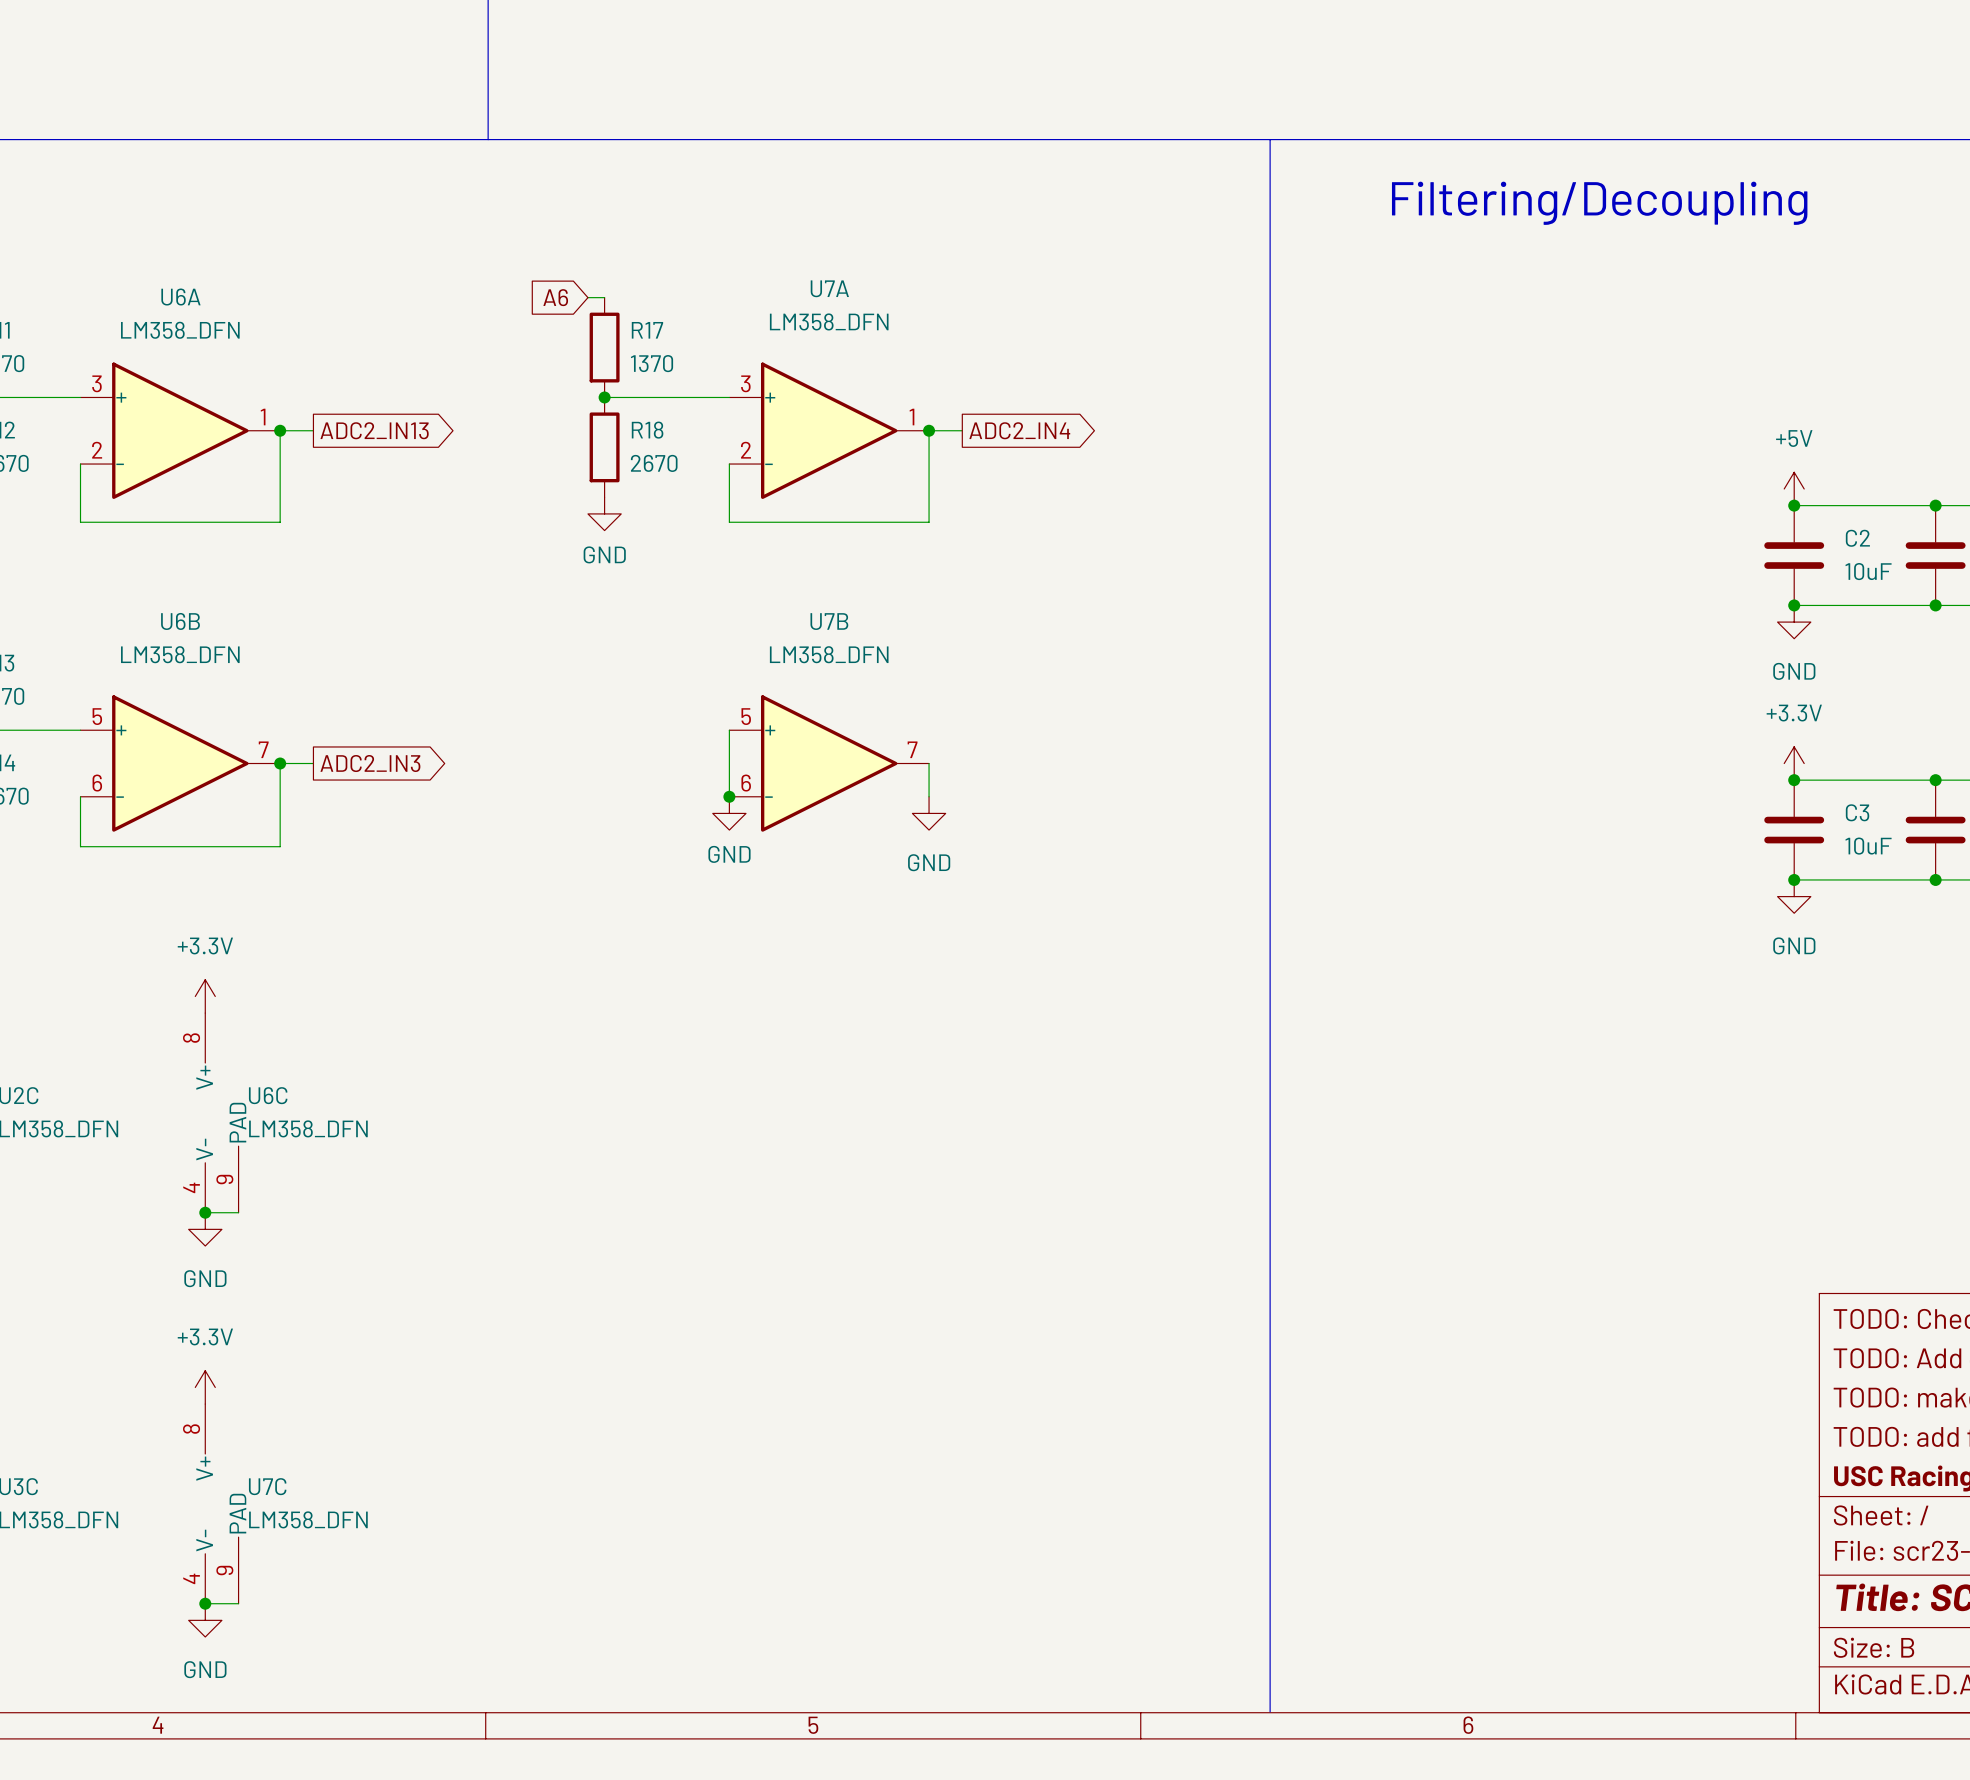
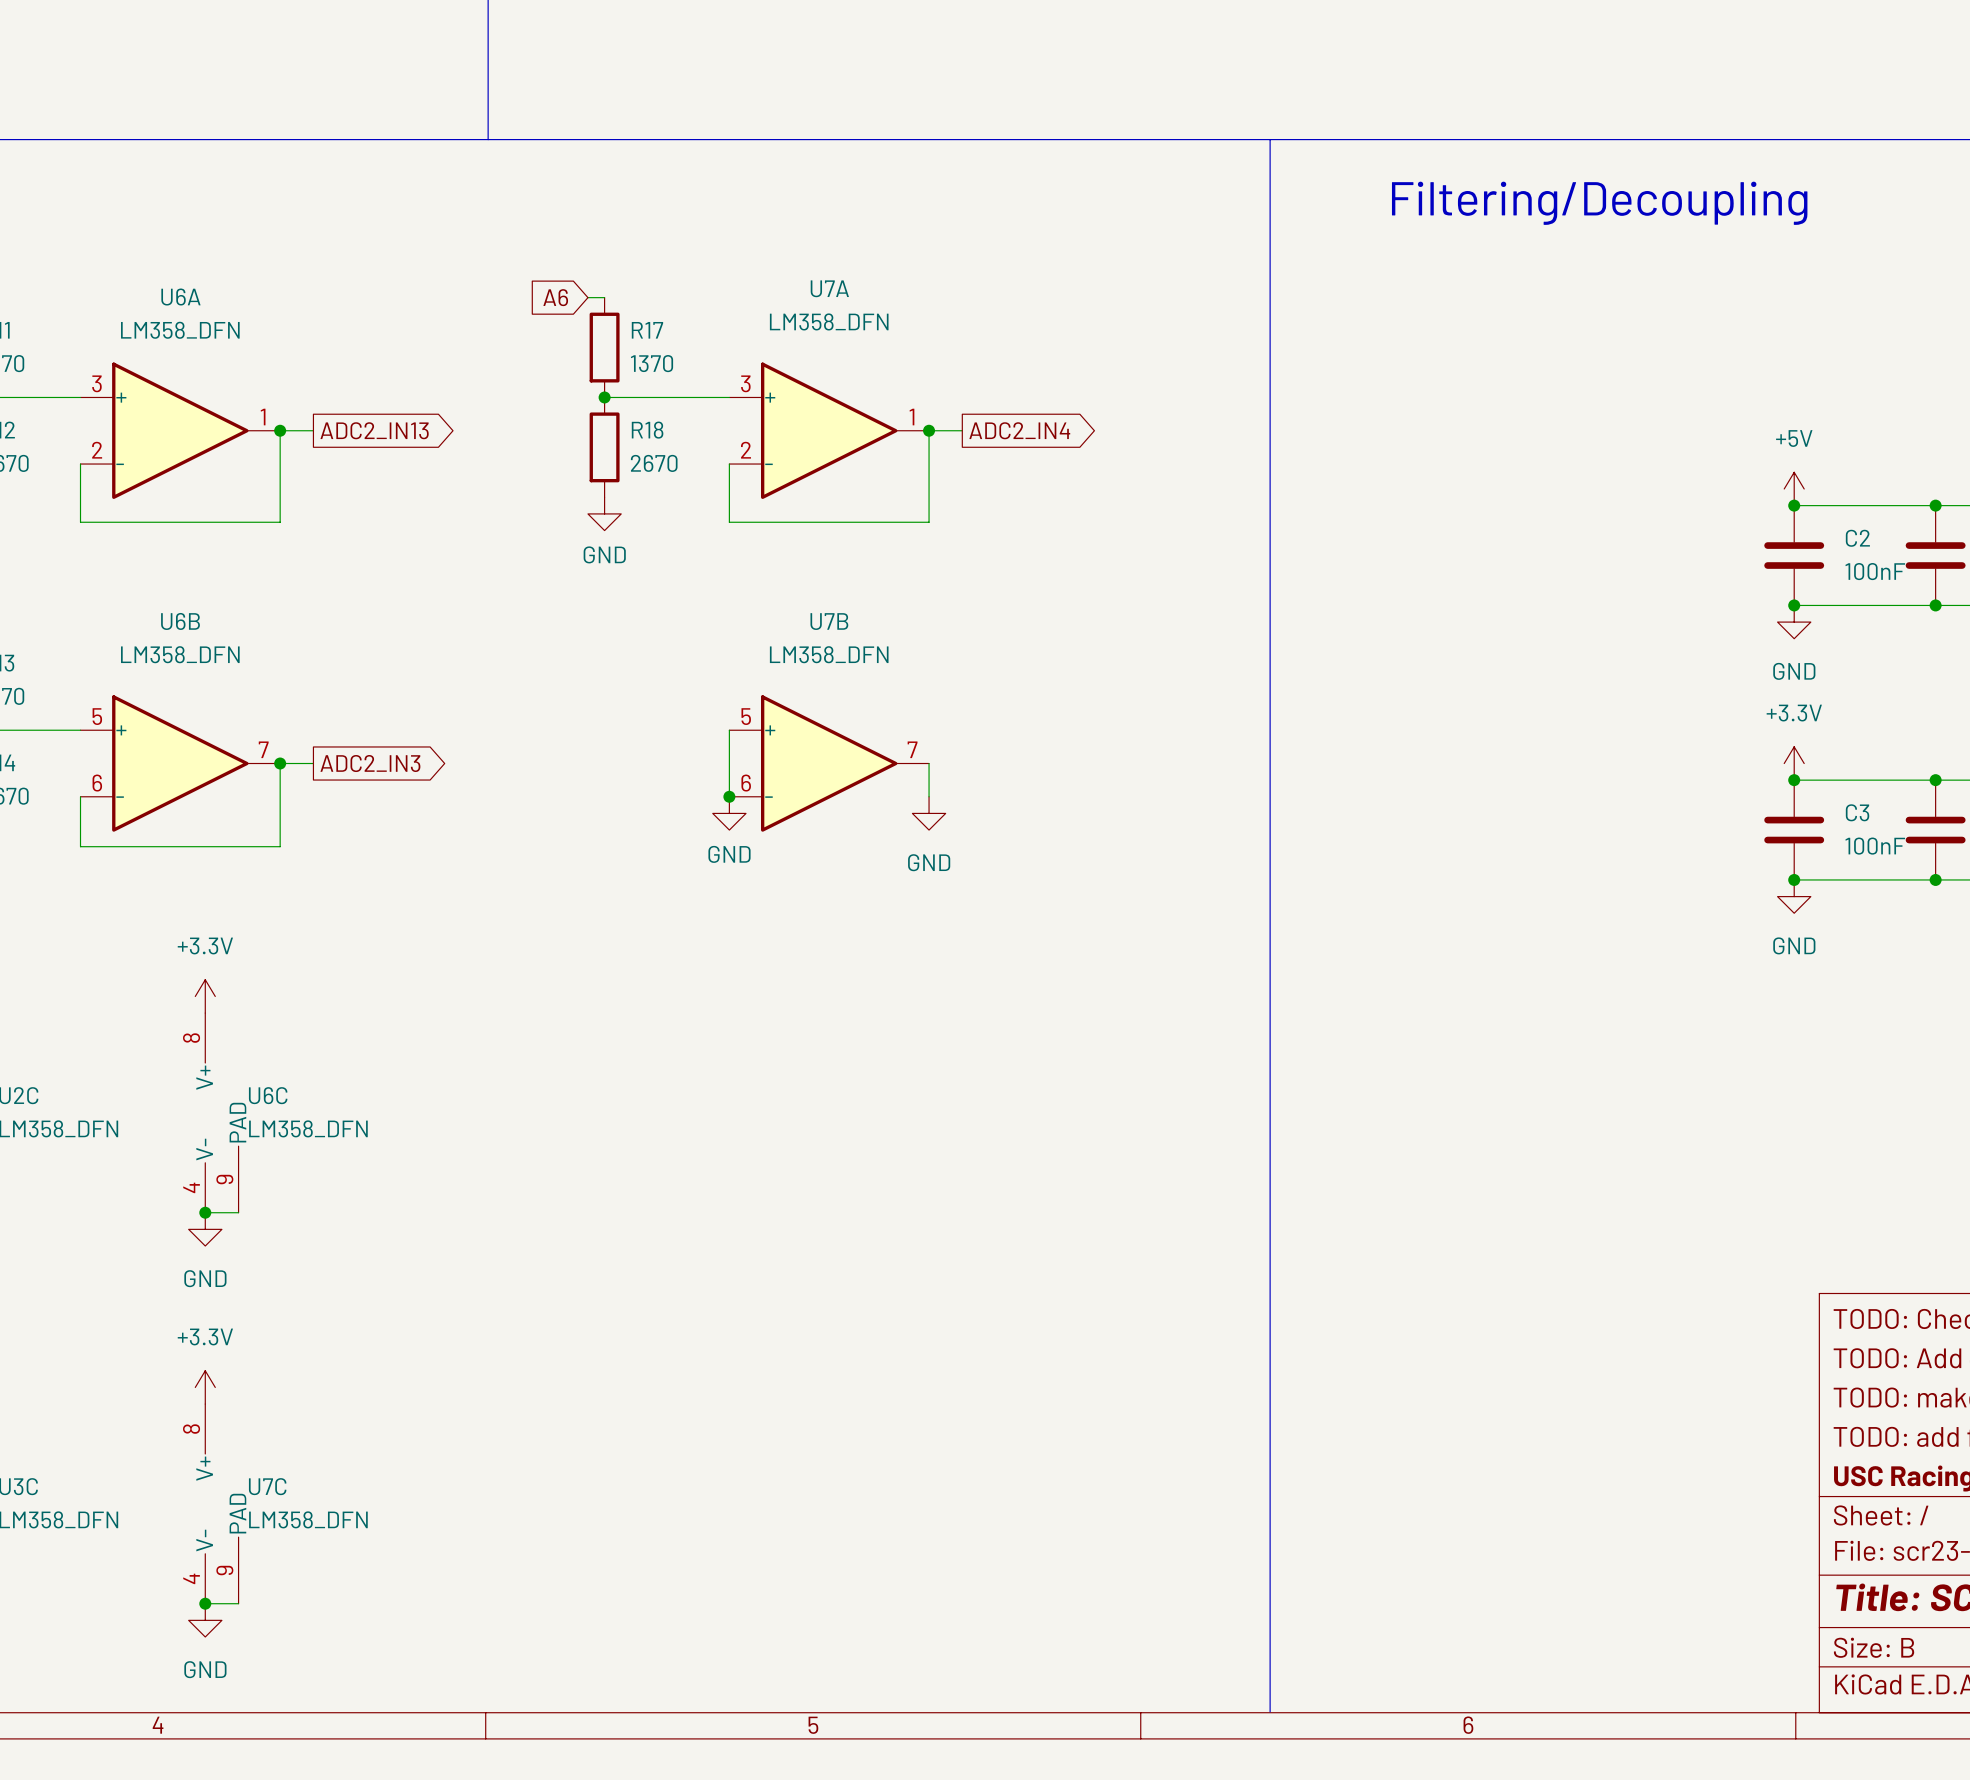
C2 value: 10uF (1868, 571) -> 100nF (1875, 571)
C3 value: 10uF (1868, 846) -> 100nF (1875, 846)

